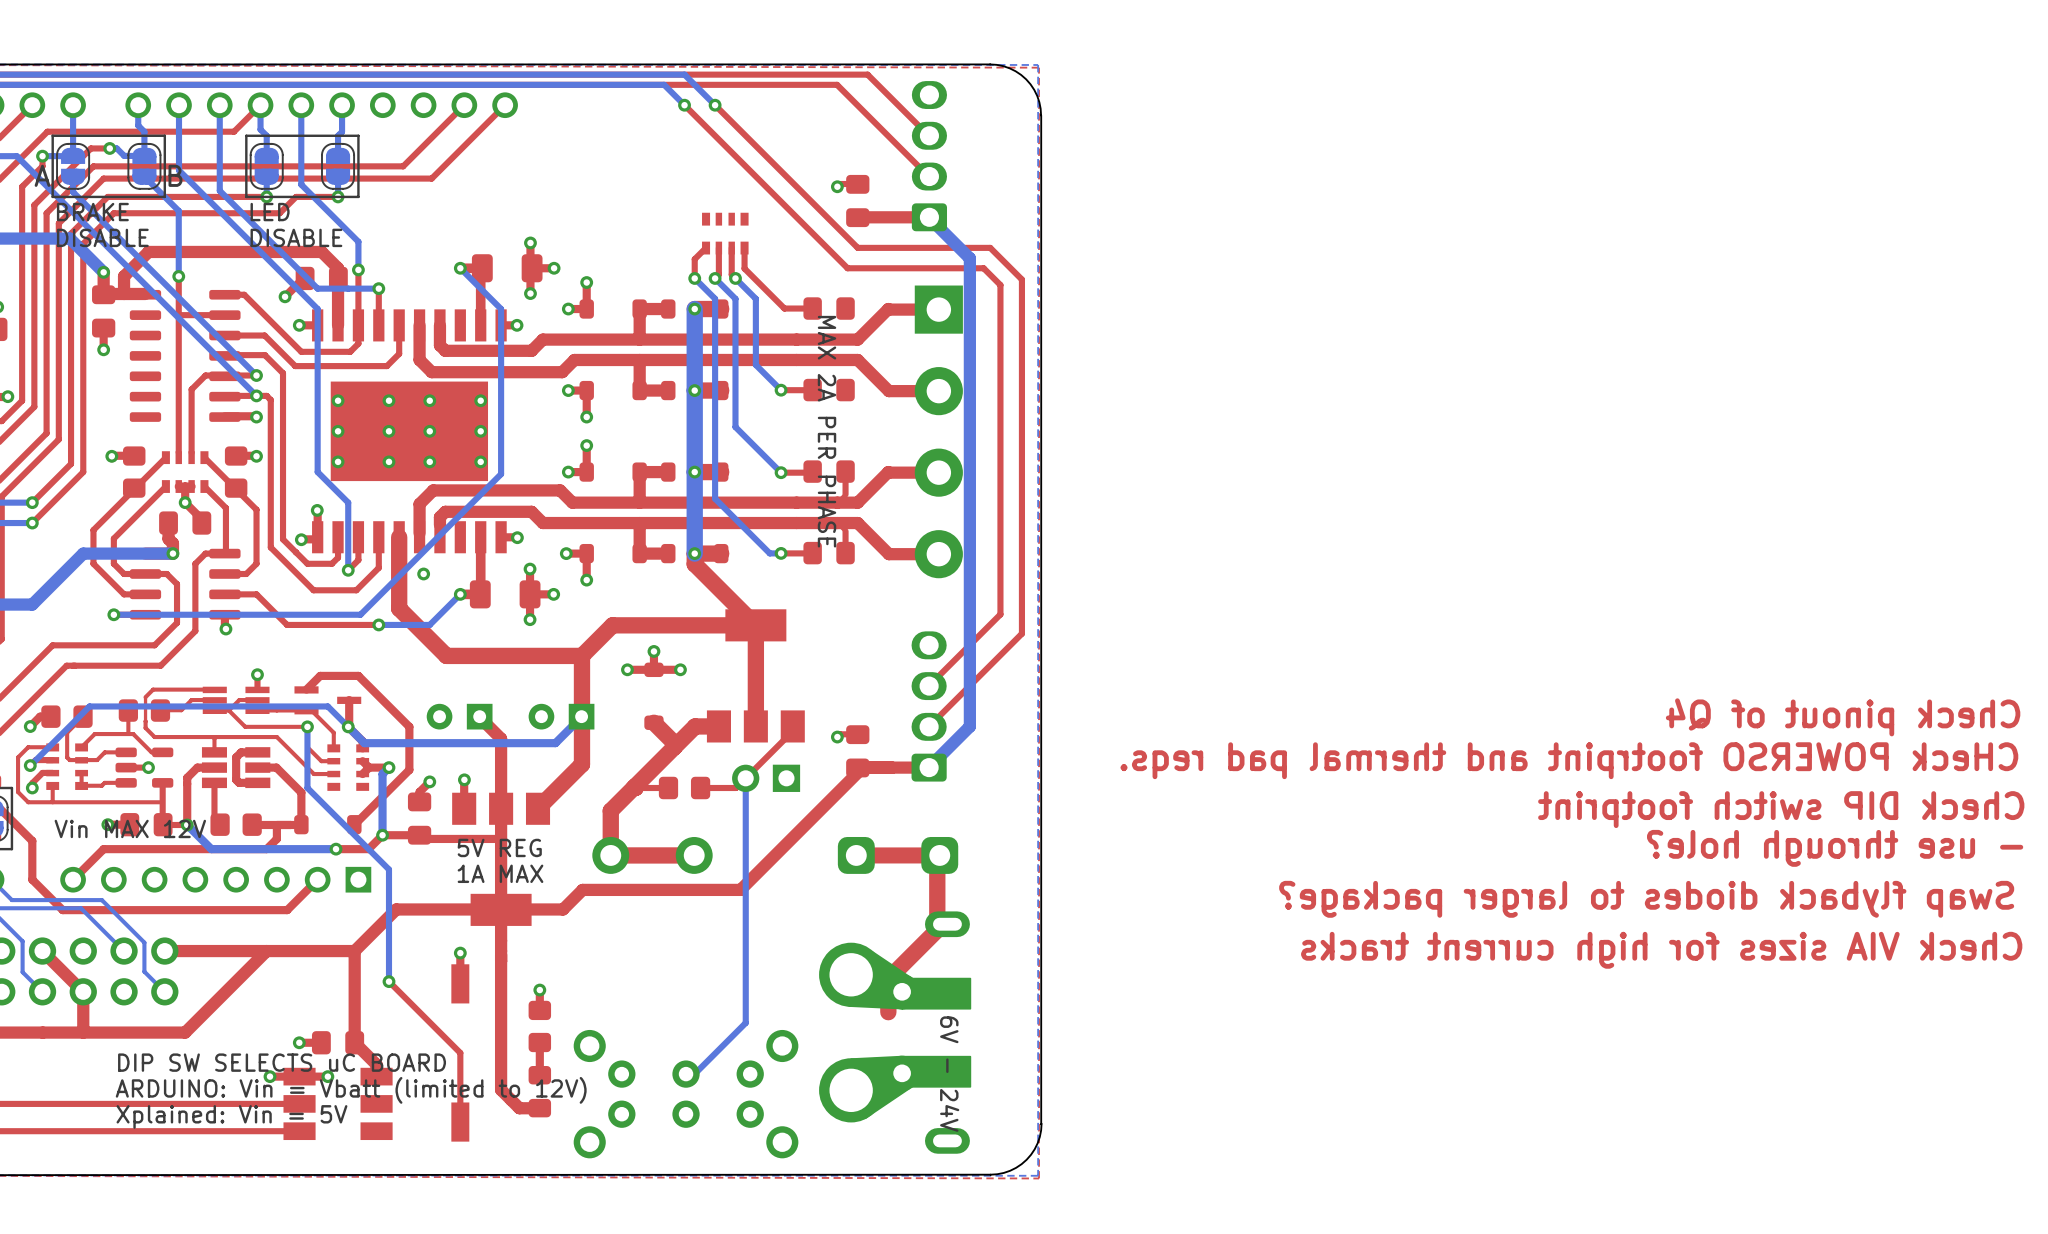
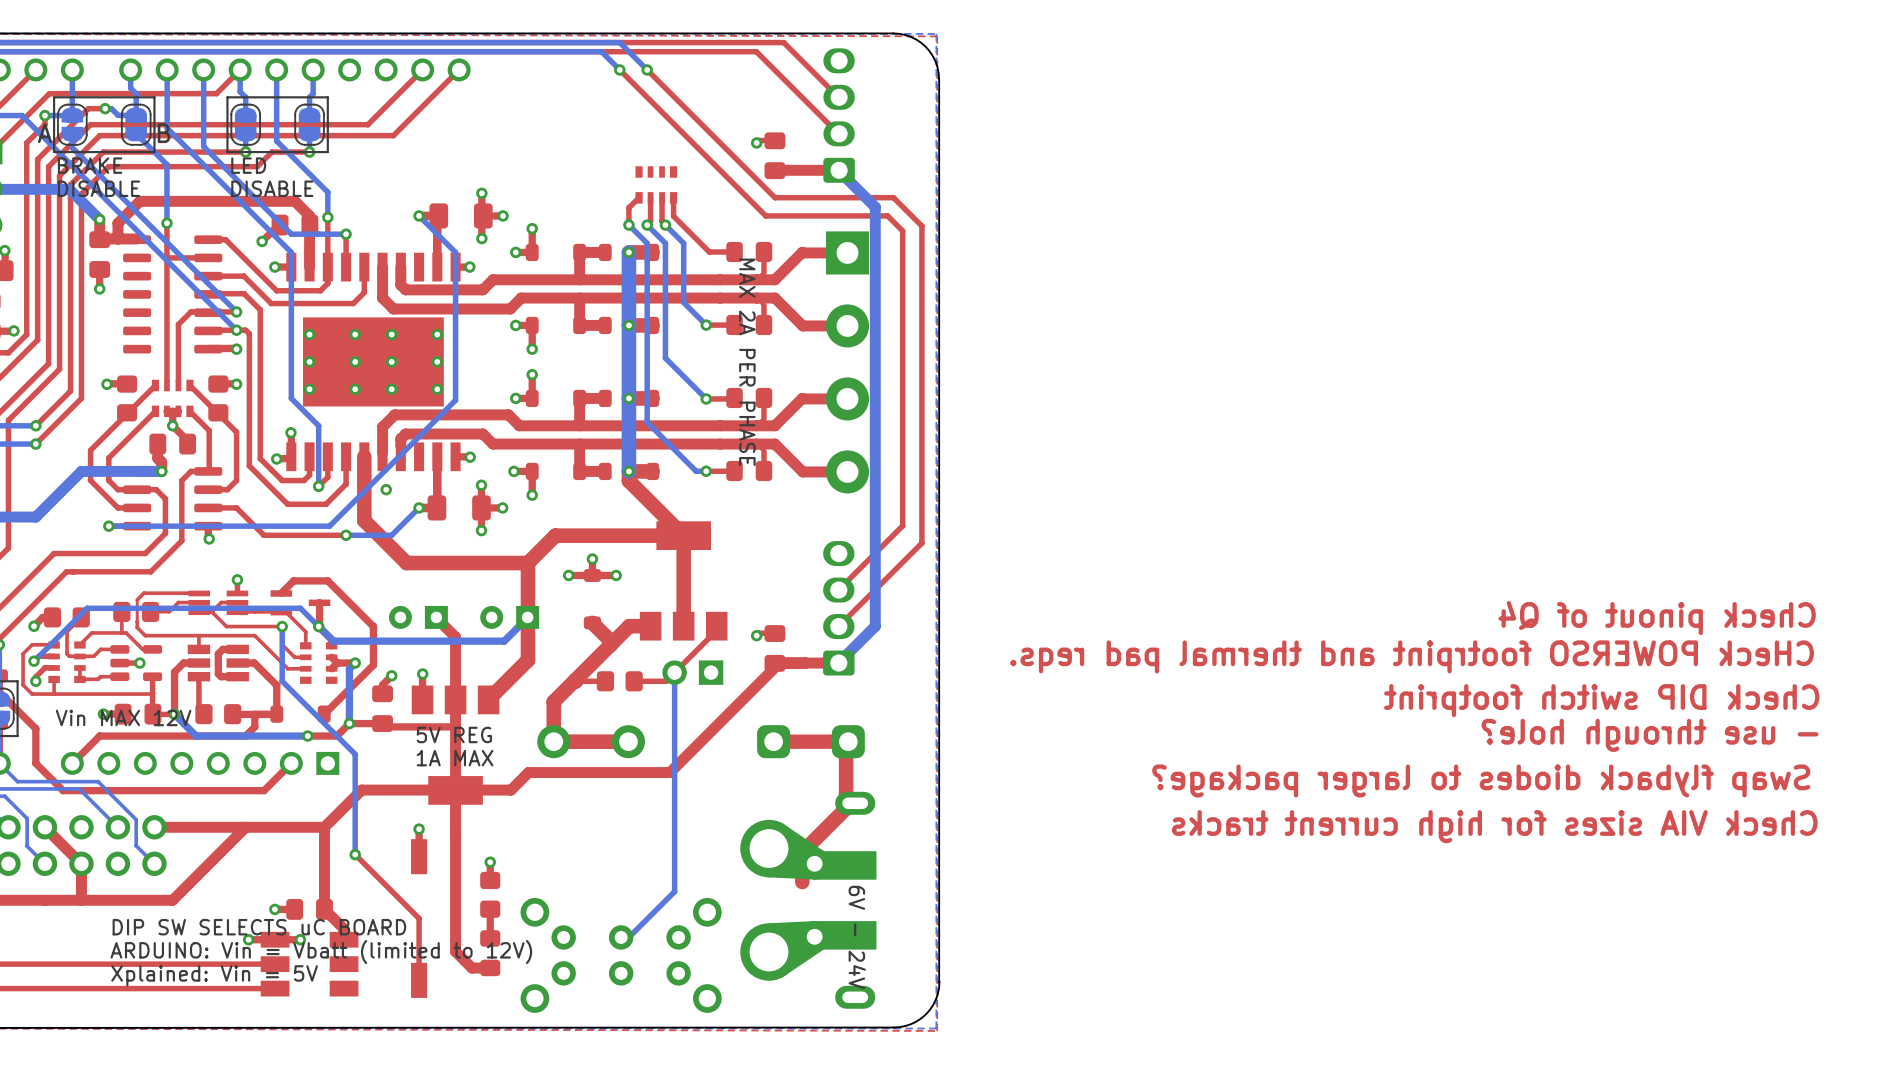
top track: none -> (763, 252) (763, 272) (756, 279)
top track: none -> (756, 298) (763, 305) (763, 324)

